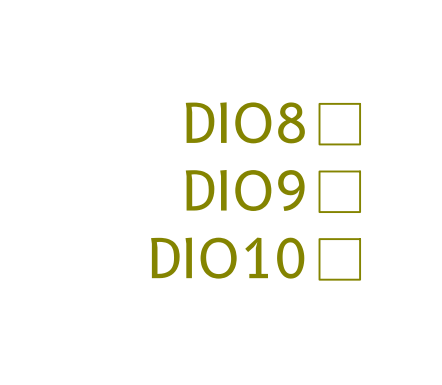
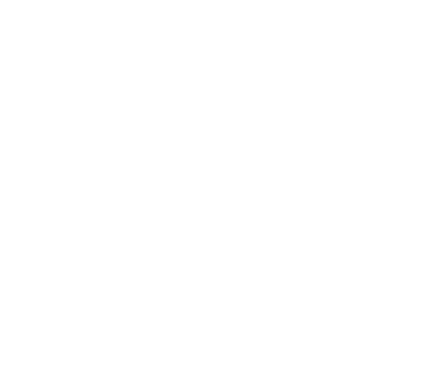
hierarchical label: DIO8 (245, 122) -> none
hierarchical label: DIO9 (245, 190) -> none
hierarchical label: DIO10 (227, 258) -> none

